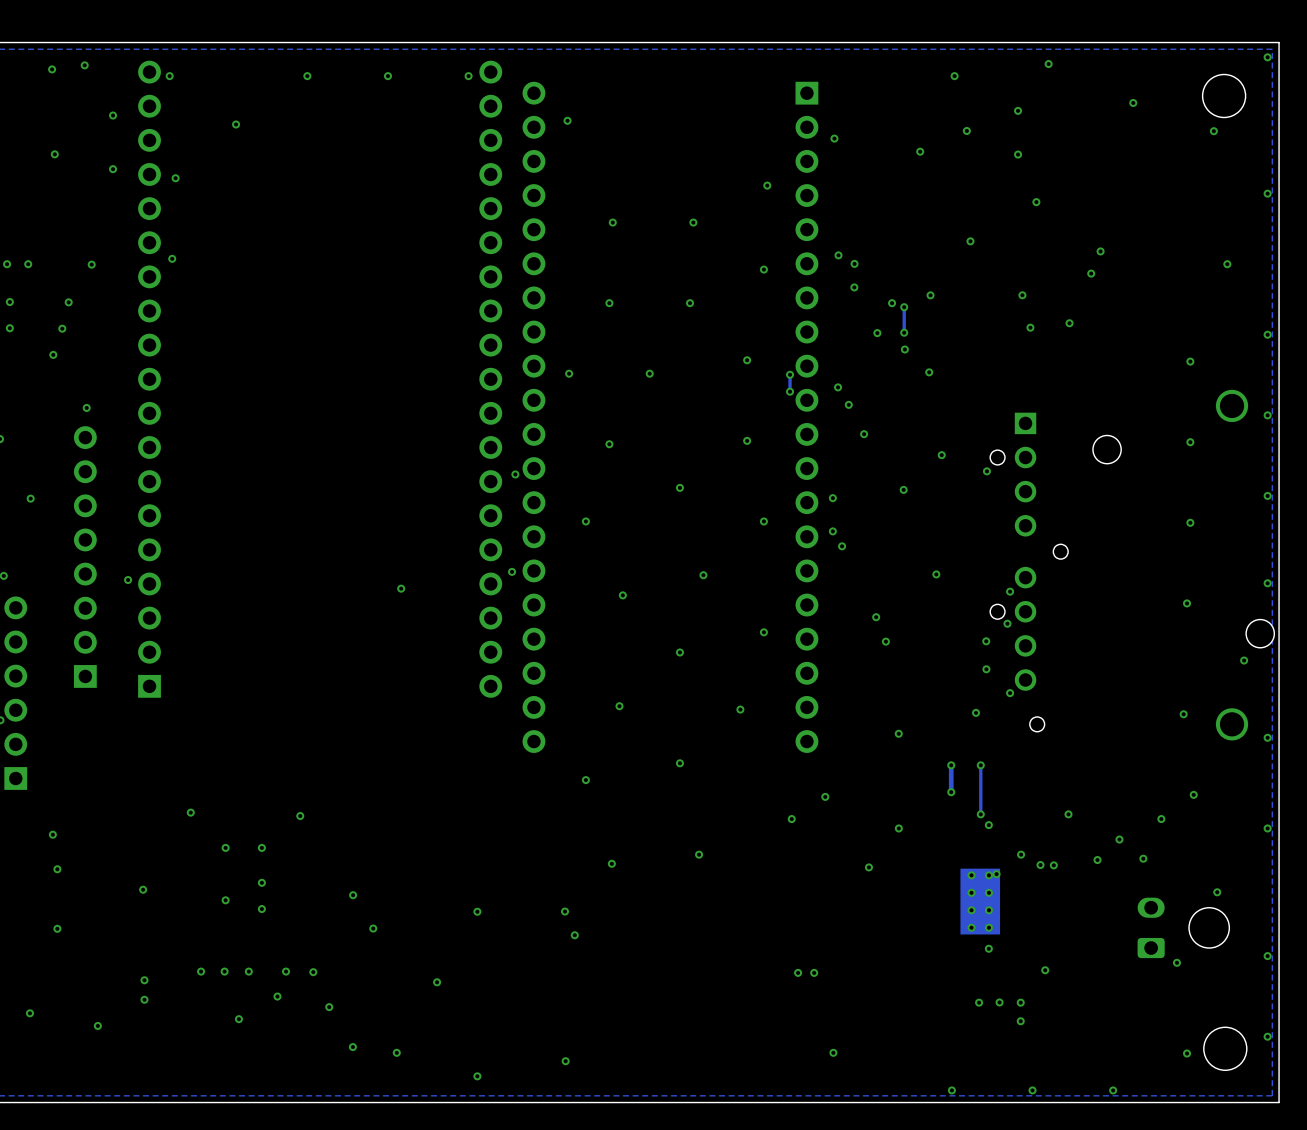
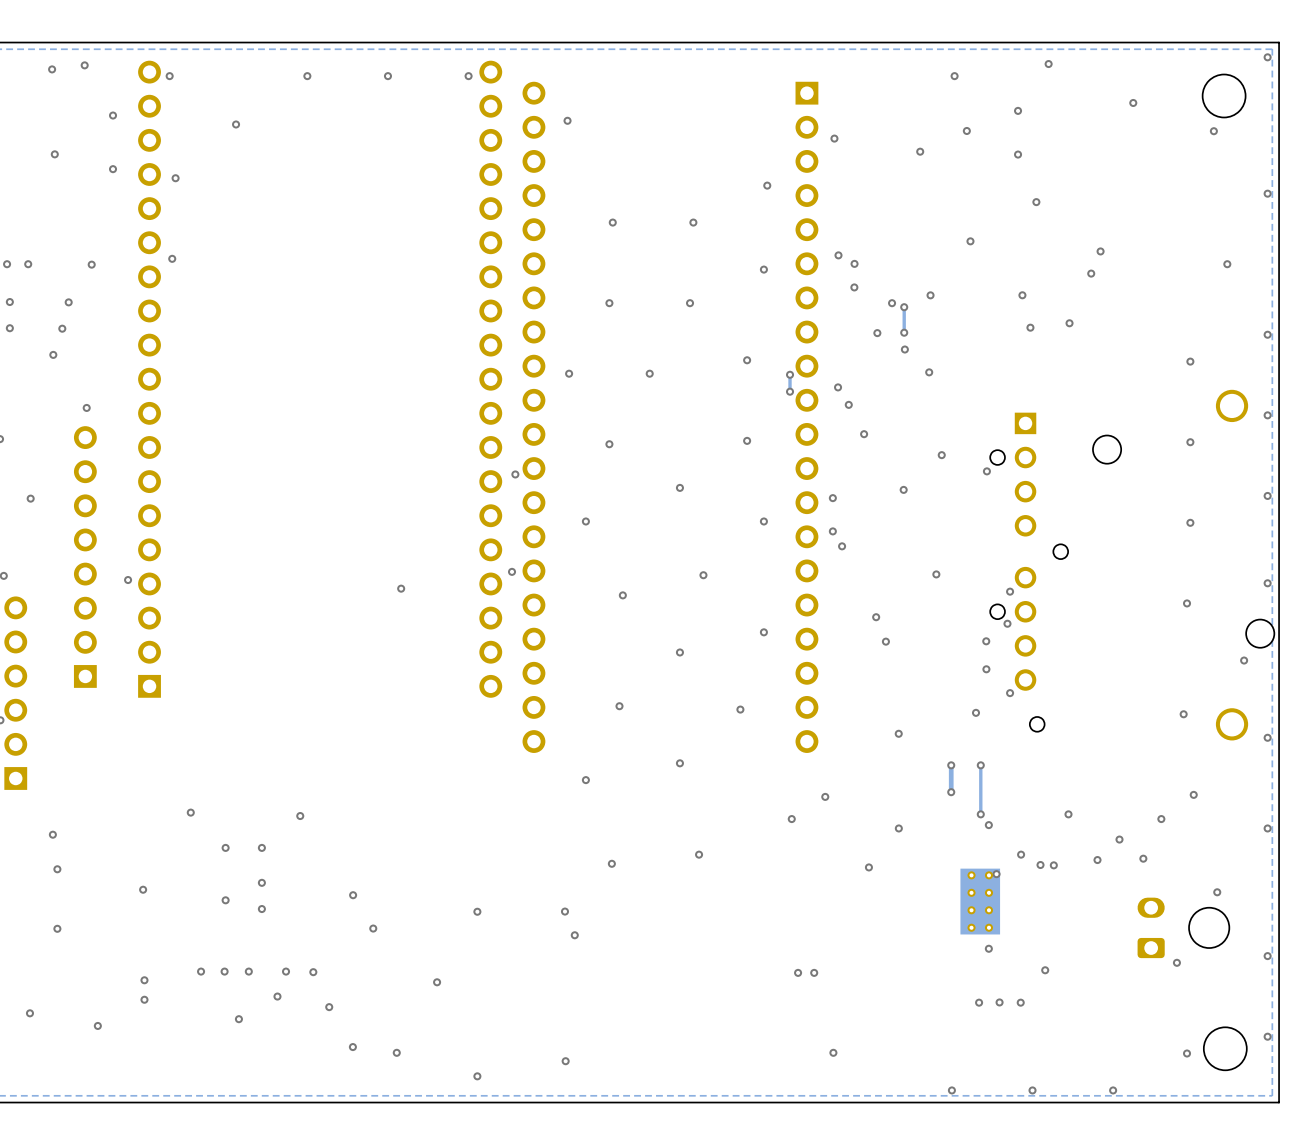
via: (1020, 1021) -> none

